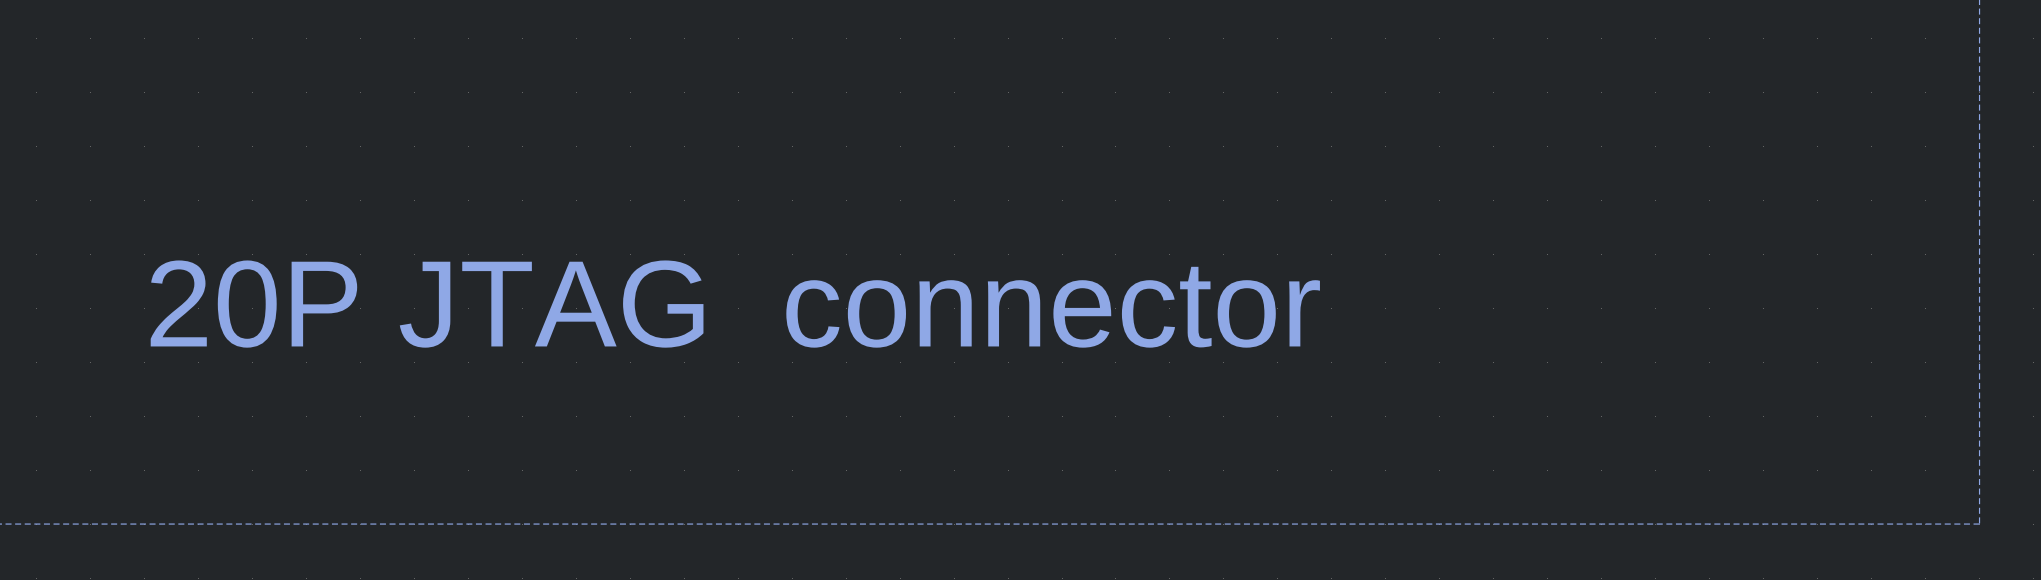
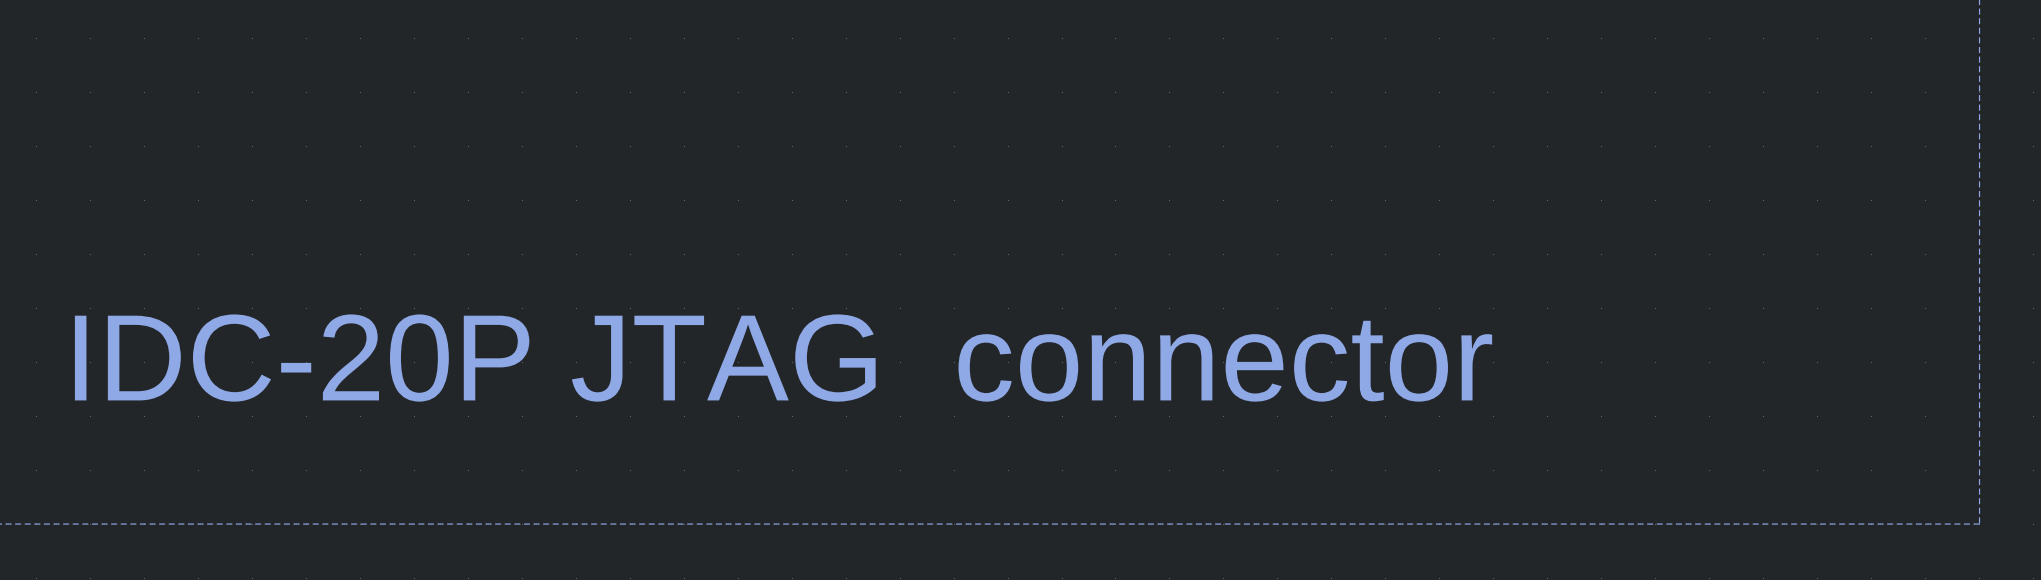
text: 20P JTAG connector (735, 304) -> IDC-20P JTAG connector (783, 358)

